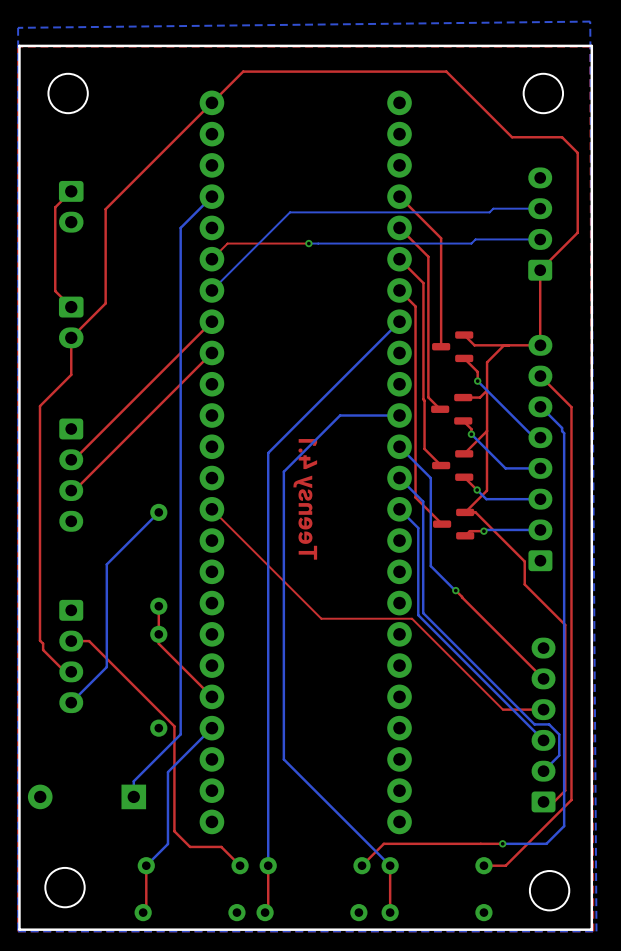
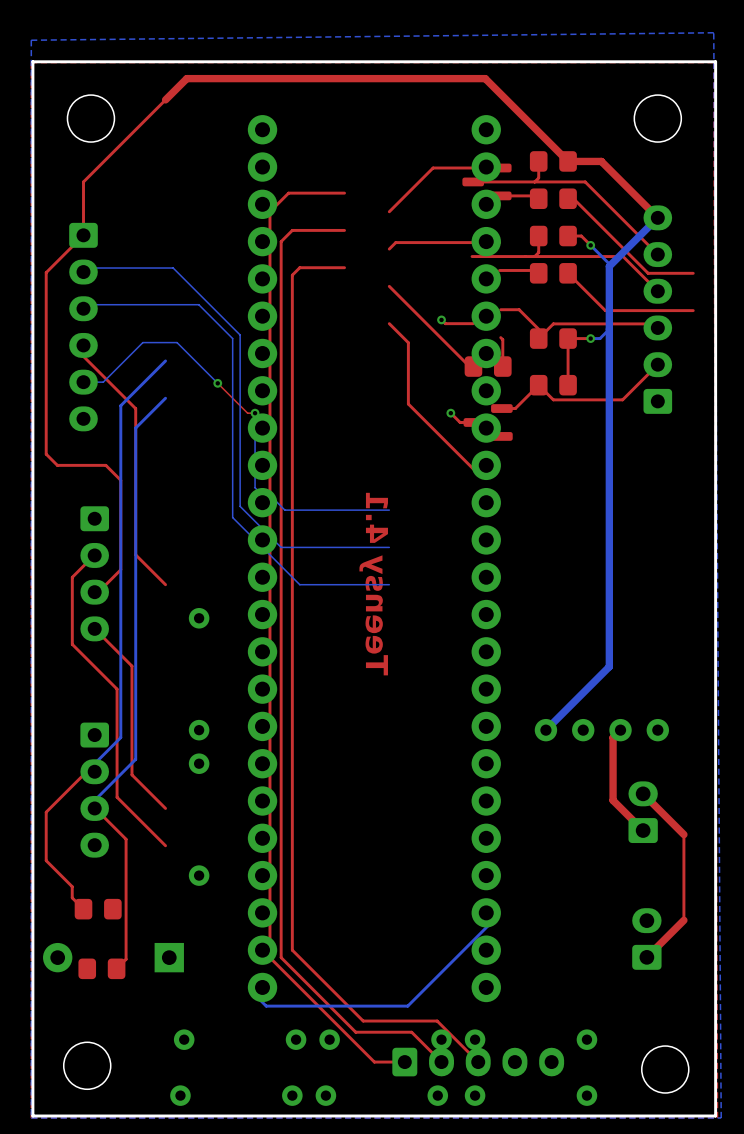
top track: none -> (538, 161) (538, 177) (534, 181)
part: none -> (553, 161)
top track: none -> (500, 168) (433, 168) (389, 211)
top track: none -> (473, 181) (585, 181) (657, 254)
part: none -> (486, 181)
top track: none -> (344, 193) (288, 193) (269, 211) (269, 957) (374, 1062) (404, 1062)
top track: none -> (500, 195) (535, 195) (538, 198)
part: none -> (553, 198)
top track: none -> (568, 198) (573, 198) (648, 273) (693, 273)
bottom track: none -> (657, 217) (609, 266)
top track: none -> (344, 230) (292, 230) (281, 241) (281, 957) (355, 1032) (411, 1032) (441, 1062)
top track: (71, 191) (55, 207) (55, 291) (71, 307) -> none
top track: none -> (538, 236) (538, 252) (534, 256)
part: none -> (553, 236)
top track: none -> (568, 236) (581, 236) (590, 245)
bottom track: (211, 196) (180, 227) (180, 734) (133, 781) (133, 796) -> none
top track: (399, 196) (441, 238) (441, 346) -> none
top track: none -> (499, 242) (395, 242) (389, 249)
bottom track: none -> (590, 245) (609, 263) (609, 266)
via: none -> (590, 245)
part: (71, 206) -> none
bottom track: (540, 208) (493, 208) (489, 212) (290, 212) (211, 290) -> none
top track: none -> (472, 256) (623, 256) (657, 291)
bottom track: none -> (609, 266) (609, 666) (545, 730)
top track: none -> (344, 267) (299, 267) (292, 275) (292, 950) (363, 1021) (437, 1021) (478, 1062)
top track: none -> (499, 270) (535, 270) (538, 273)
bottom track: none -> (83, 272) (87, 268) (173, 268) (240, 335) (240, 506) (281, 547) (389, 547)
part: none -> (553, 273)
top track: none -> (568, 273) (605, 310) (693, 310)
part: (540, 224) -> none
top track: (399, 227) (428, 256) (428, 397) (440, 409) -> none
top track: none -> (389, 286) (469, 366) (473, 366)
bottom track: (540, 239) (475, 239) (471, 243) (308, 243) -> none
top track: (308, 243) (227, 243) (211, 259) -> none
via position: (308, 243) -> (441, 319)
bottom track: none -> (83, 308) (87, 304) (198, 304) (232, 338) (232, 517) (299, 584) (389, 584)
top track: none -> (500, 309) (519, 309) (538, 329)
part: none -> (657, 309)
top track: (399, 259) (423, 283) (424, 448) (441, 465) -> none
top track: none -> (441, 319) (445, 323) (473, 323)
top track: none -> (389, 323) (408, 342) (408, 404) (473, 469)
part: none -> (83, 327)
top track: none -> (657, 327) (653, 323) (553, 323) (538, 338)
bottom track: none -> (609, 329) (600, 338) (590, 338)
top track: none -> (500, 337) (502, 339) (502, 366)
part: none -> (553, 338)
top track: none -> (590, 338) (568, 338) (568, 385)
via: none -> (590, 338)
top track: none -> (83, 345) (83, 356) (135, 408) (135, 554) (165, 584)
top track: (399, 290) (415, 306) (415, 497) (442, 524) -> none
bottom track: none -> (165, 360) (120, 405) (120, 737) (90, 767)
top track: none -> (657, 364) (622, 399) (553, 399) (538, 385) (515, 408) (501, 408)
part: none -> (488, 366)
bottom track: none -> (83, 382) (103, 382) (142, 342) (177, 342) (217, 383)
top track: none -> (217, 383) (247, 413) (255, 413)
via: none -> (217, 383)
part: none -> (553, 385)
top track: (211, 321) (73, 459) (71, 459) -> (165, 845) (117, 797) (117, 689) (72, 644) (72, 577) (94, 555)
bottom track: (399, 321) (268, 453) (268, 865) -> none
part: (71, 322) -> none
bottom track: none -> (165, 398) (135, 428) (135, 759) (90, 804)
top track: (464, 335) (474, 345) (540, 345) (540, 270) (577, 232) (577, 152) (562, 137) (512, 137) (446, 71) (243, 71) (105, 209) (105, 303) (71, 337) (71, 374) (39, 406) (39, 640) (43, 643) (43, 649) (65, 671) (71, 671) -> none
bottom track: none -> (255, 413) (255, 487) (266, 498) (273, 498) (284, 510) (389, 510)
via: none -> (255, 413)
top track: none -> (450, 413) (460, 422) (474, 422)
via: none -> (450, 413)
top track: (504, 345) (487, 362) (487, 430) (464, 453) -> none
part: (452, 346) -> none
part: none -> (488, 422)
top track: (211, 352) (93, 471) -> (657, 217) (601, 161) (568, 161) (485, 78) (186, 78) (83, 181) (83, 235) (46, 272) (46, 454) (57, 465) (105, 465) (120, 480) (120, 569)
top track: (464, 358) (477, 371) (477, 381) -> none
top track: (540, 376) (571, 407) (571, 799) (505, 865) (483, 865) -> none
bottom track: (477, 381) (534, 437) (540, 437) -> none
via: (477, 381) -> none
top track: (487, 390) (480, 397) (463, 397) -> none
bottom track: (540, 406) (562, 428) (564, 433) (564, 826) (546, 843) (502, 843) -> none
part: (451, 409) -> none
bottom track: (399, 415) (340, 415) (283, 471) (283, 759) (390, 865) -> none
top track: (463, 420) (471, 429) (471, 434) -> none
top track: (486, 431) (486, 490) (465, 512) (475, 512) (524, 561) (524, 584) (565, 624) (565, 693) -> (643, 793) (683, 834)
bottom track: (471, 434) (505, 468) (540, 468) -> none
via: (471, 434) -> none
bottom track: (399, 446) (430, 478) (430, 566) (455, 590) -> none
part: (540, 453) -> none
part: (452, 465) -> none
top track: (464, 477) (477, 490) -> none
bottom track: (399, 478) (423, 501) (423, 613) (534, 724) (549, 724) (559, 734) (559, 755) (543, 771) -> none
bottom track: (477, 490) (486, 499) (540, 499) -> none
via: (477, 490) -> none
top track: (211, 509) (321, 618) (412, 618) (502, 709) (543, 709) -> none
bottom track: (399, 509) (418, 528) (418, 615) (543, 740) -> none
bottom track: (158, 512) (106, 564) (106, 667) (71, 702) -> none
top track: none -> (94, 628) (131, 666) (131, 774) (165, 808)
part: (453, 524) -> none
bottom track: (540, 529) (483, 531) -> none
top track: (483, 531) (469, 531) (465, 535) -> none
via: (483, 531) -> none
top track: (455, 590) (543, 678) -> none
via: (455, 590) -> none
top track: (158, 606) (158, 643) (211, 696) -> none
part: none -> (601, 730)
top track: none -> (620, 730) (613, 737) (613, 800) (643, 830)
top track: none -> (90, 767) (46, 812) (46, 860) (72, 886) (72, 897) (83, 909)
top track: (71, 641) (89, 641) (174, 726) (174, 831) (190, 846) (221, 846) (240, 865) -> none
top track: none -> (90, 804) (126, 839) (126, 959) (116, 968)
part: none -> (643, 812)
part: (543, 725) -> none
bottom track: (211, 728) (167, 772) (167, 844) (146, 865) -> none
part: none -> (98, 909)
top track: (565, 765) (565, 790) (553, 801) (543, 801) -> (683, 920) (646, 957)
bottom track: none -> (489, 923) (407, 1006) (266, 1006) (258, 998)
part: none -> (646, 938)
part: none -> (101, 968)
top track: (502, 843) (383, 843) (362, 865) -> none
via: (502, 843) -> none
top track: (146, 865) (146, 909) (143, 912) -> none
top track: (268, 865) (268, 909) (265, 912) -> none
top track: (390, 865) (390, 912) -> none
part: none -> (478, 1062)

